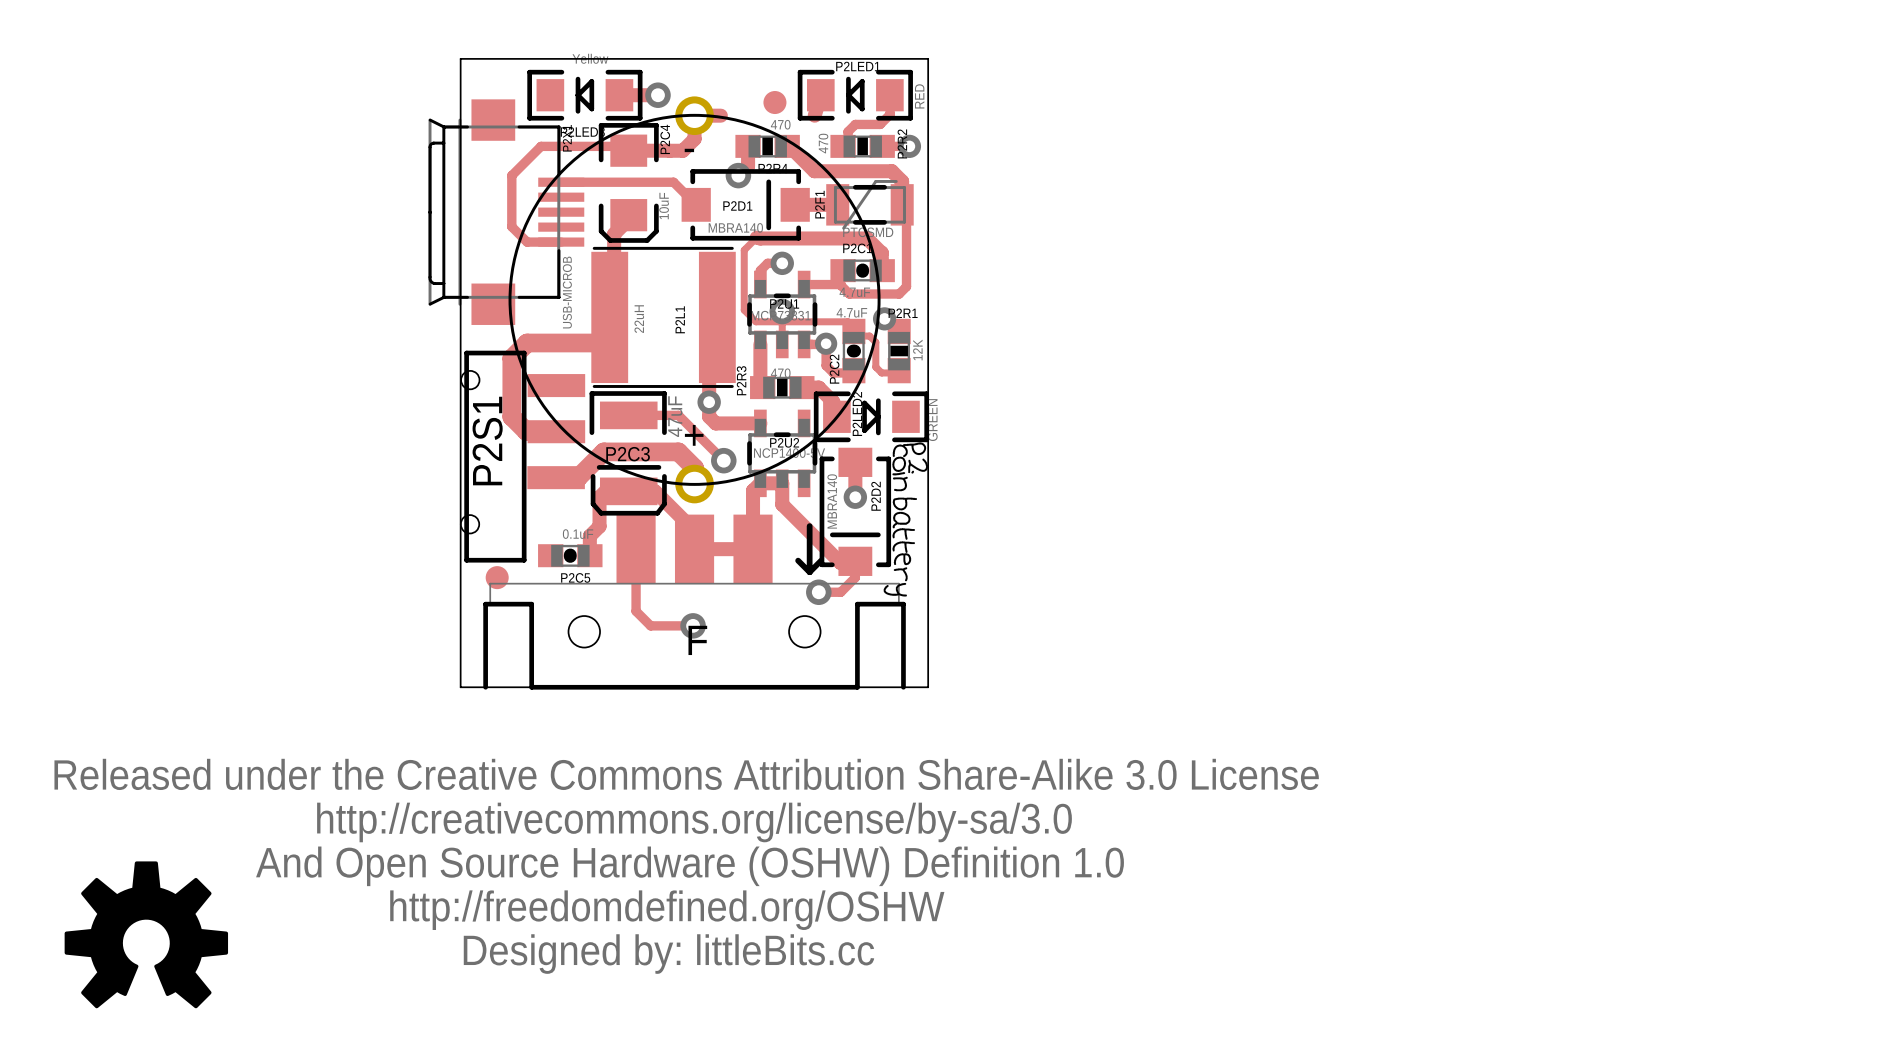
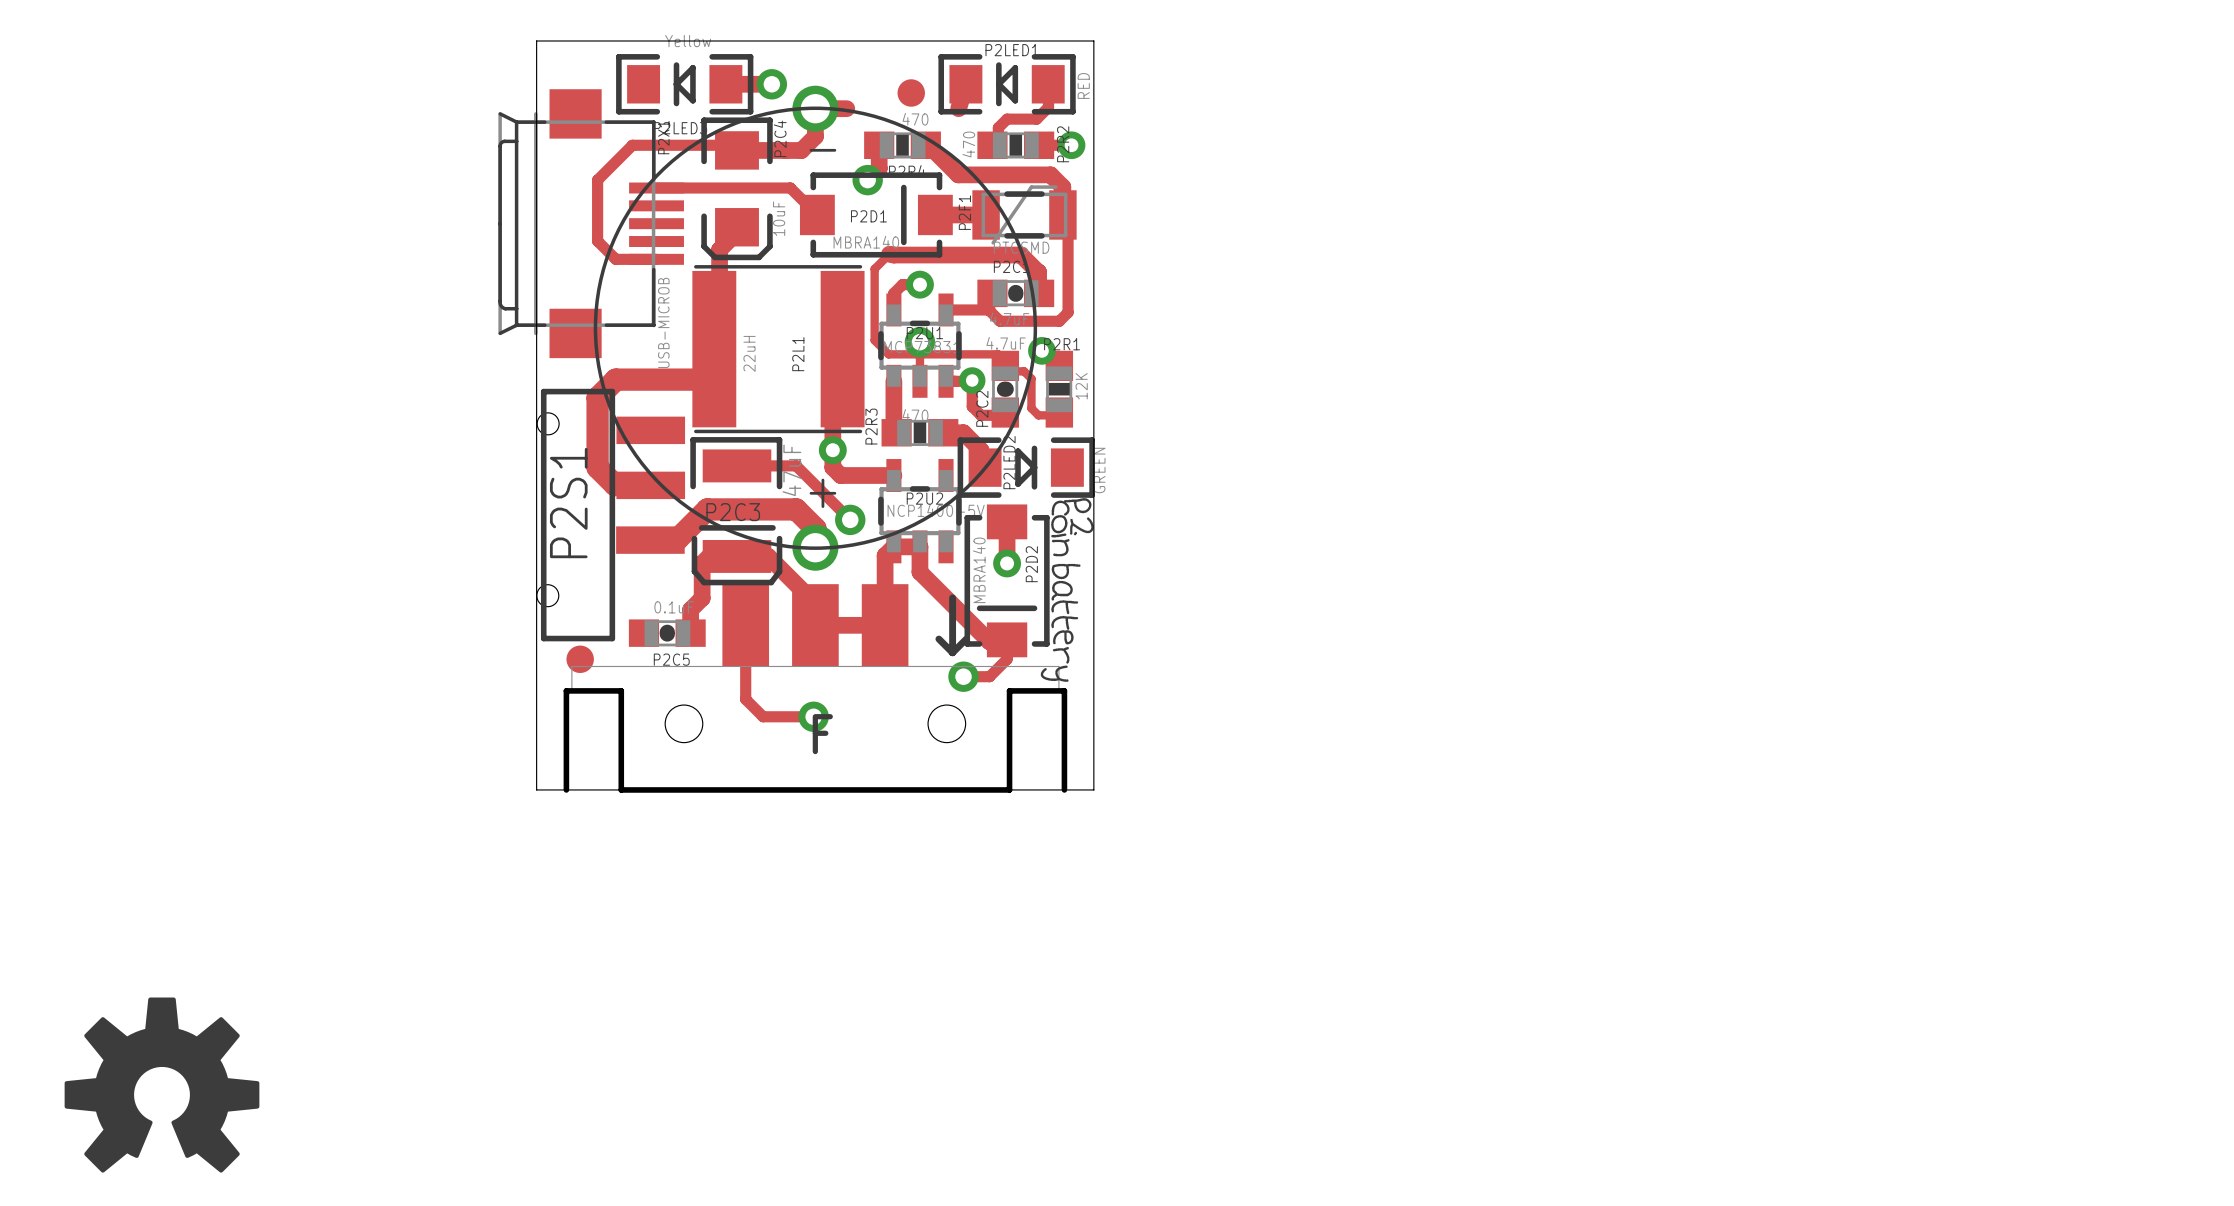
drawing: [54, 758, 1319, 974] -> none

